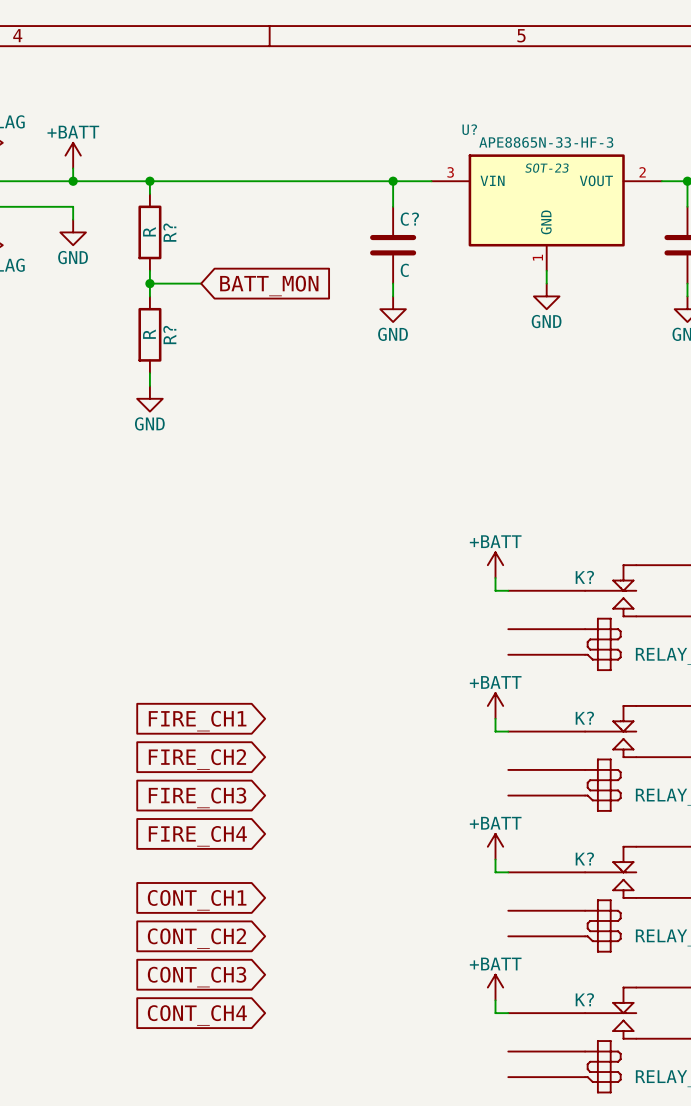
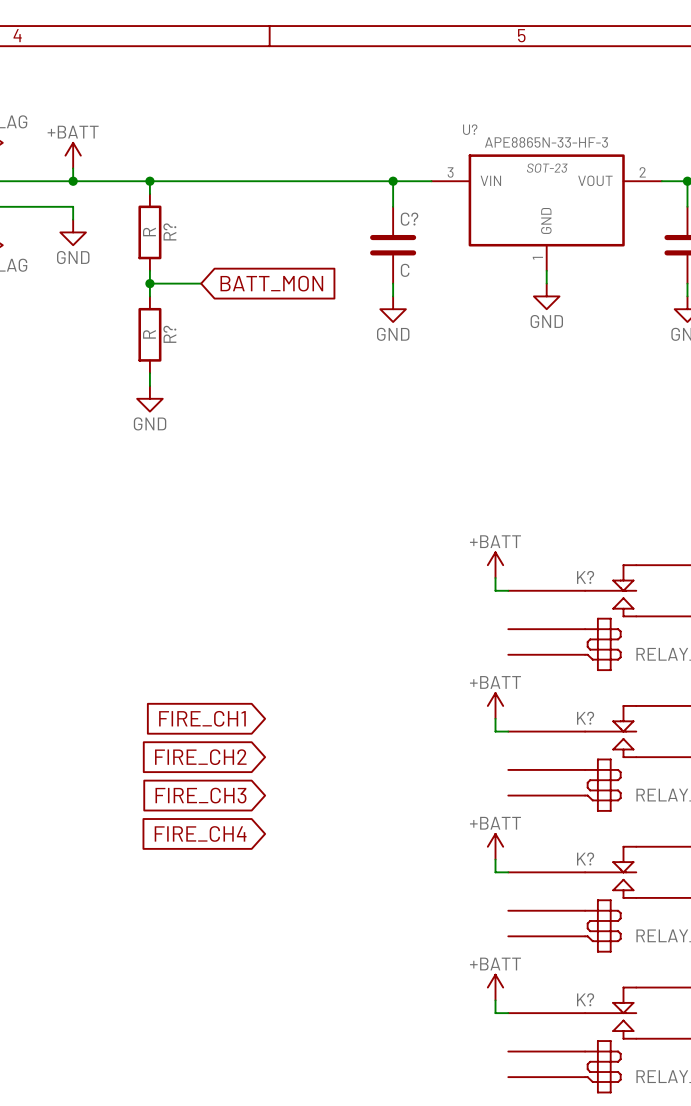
global label: CONT_CH1 (197, 900) -> none
global label: CONT_CH2 (196, 938) -> none
global label: CONT_CH3 (197, 977) -> none
global label: CONT_CH4 (197, 1015) -> none

